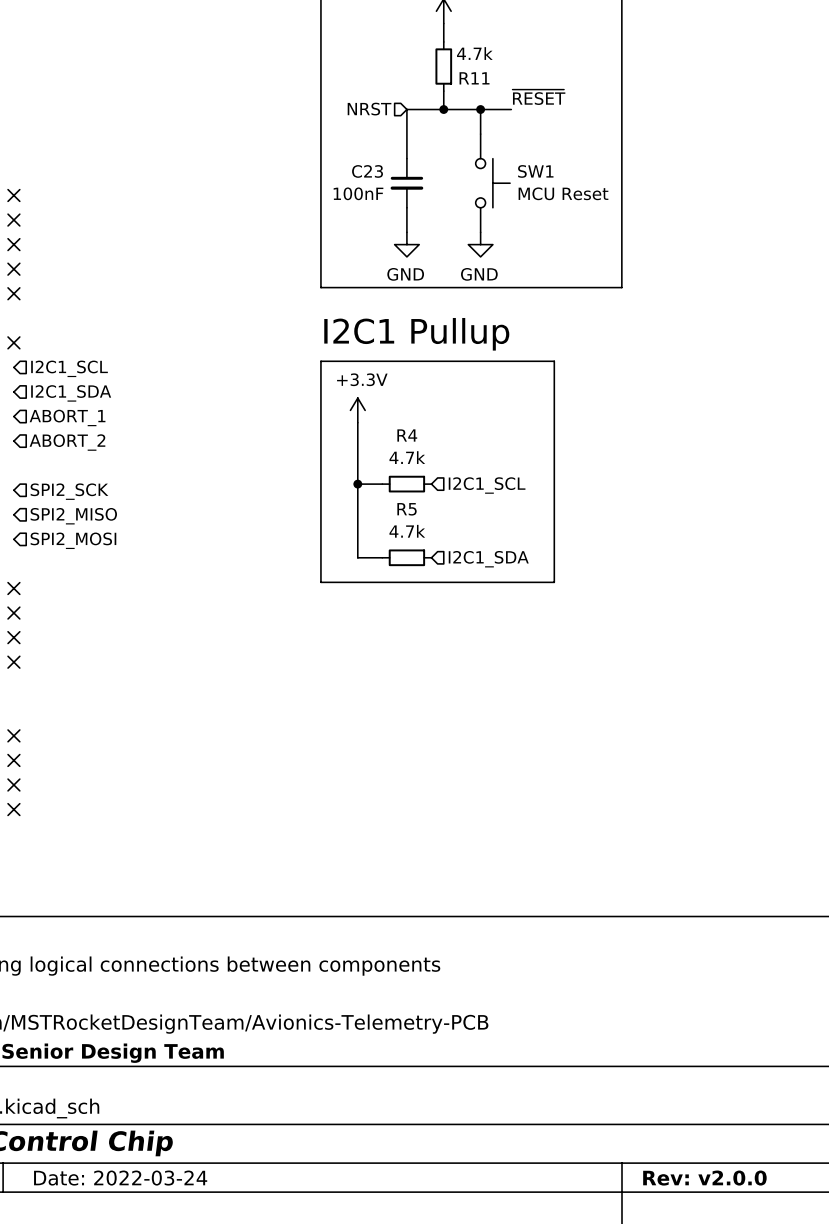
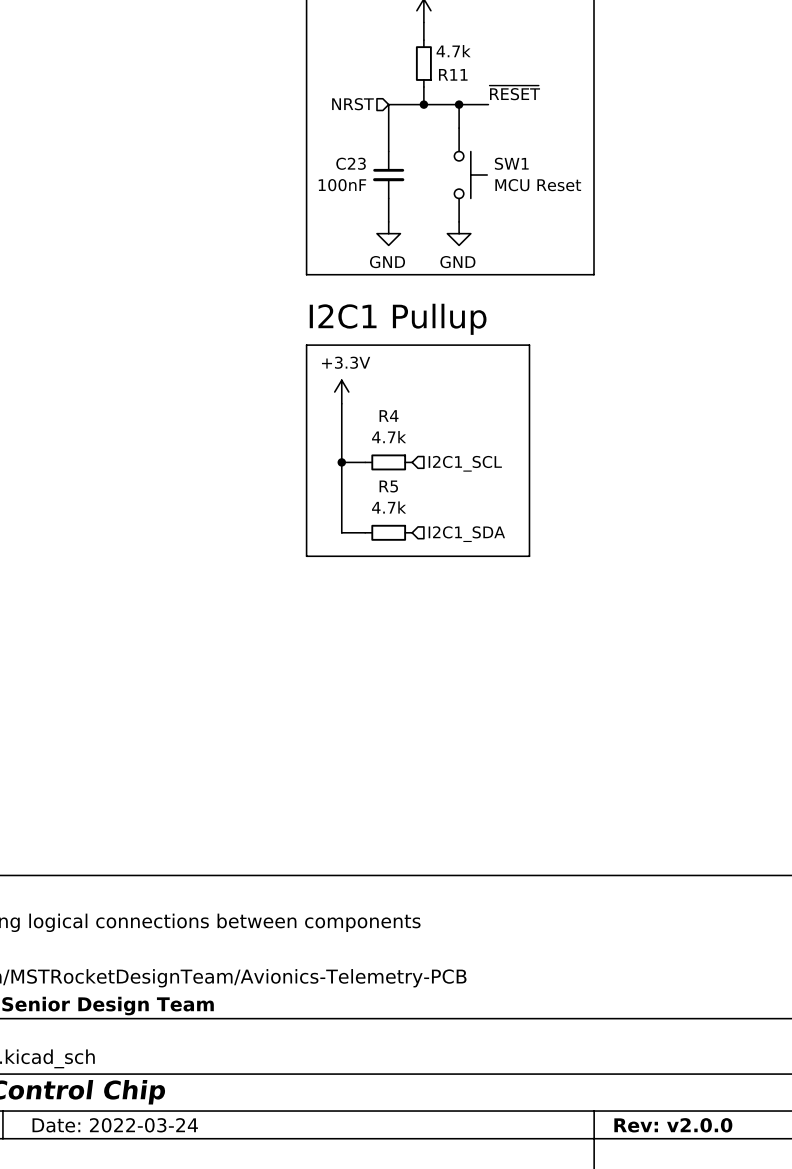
no-connect mark: (13, 195) -> none
no-connect mark: (13, 220) -> none
no-connect mark: (13, 244) -> none
no-connect mark: (13, 269) -> none
no-connect mark: (13, 293) -> none
no-connect mark: (13, 342) -> none
hierarchical label: I2C1_SCL (69, 368) -> none
hierarchical label: I2C1_SDA (71, 393) -> none
hierarchical label: ABORT_1 (67, 417) -> none
hierarchical label: ABORT_2 (67, 442) -> none
hierarchical label: SPI2_SCK (69, 491) -> none
hierarchical label: SPI2_MISO (73, 516) -> none
hierarchical label: SPI2_MOSI (73, 540) -> none
no-connect mark: (13, 588) -> none
no-connect mark: (13, 613) -> none
no-connect mark: (13, 637) -> none
no-connect mark: (13, 662) -> none
no-connect mark: (13, 735) -> none
no-connect mark: (13, 760) -> none
no-connect mark: (13, 784) -> none
no-connect mark: (13, 809) -> none

